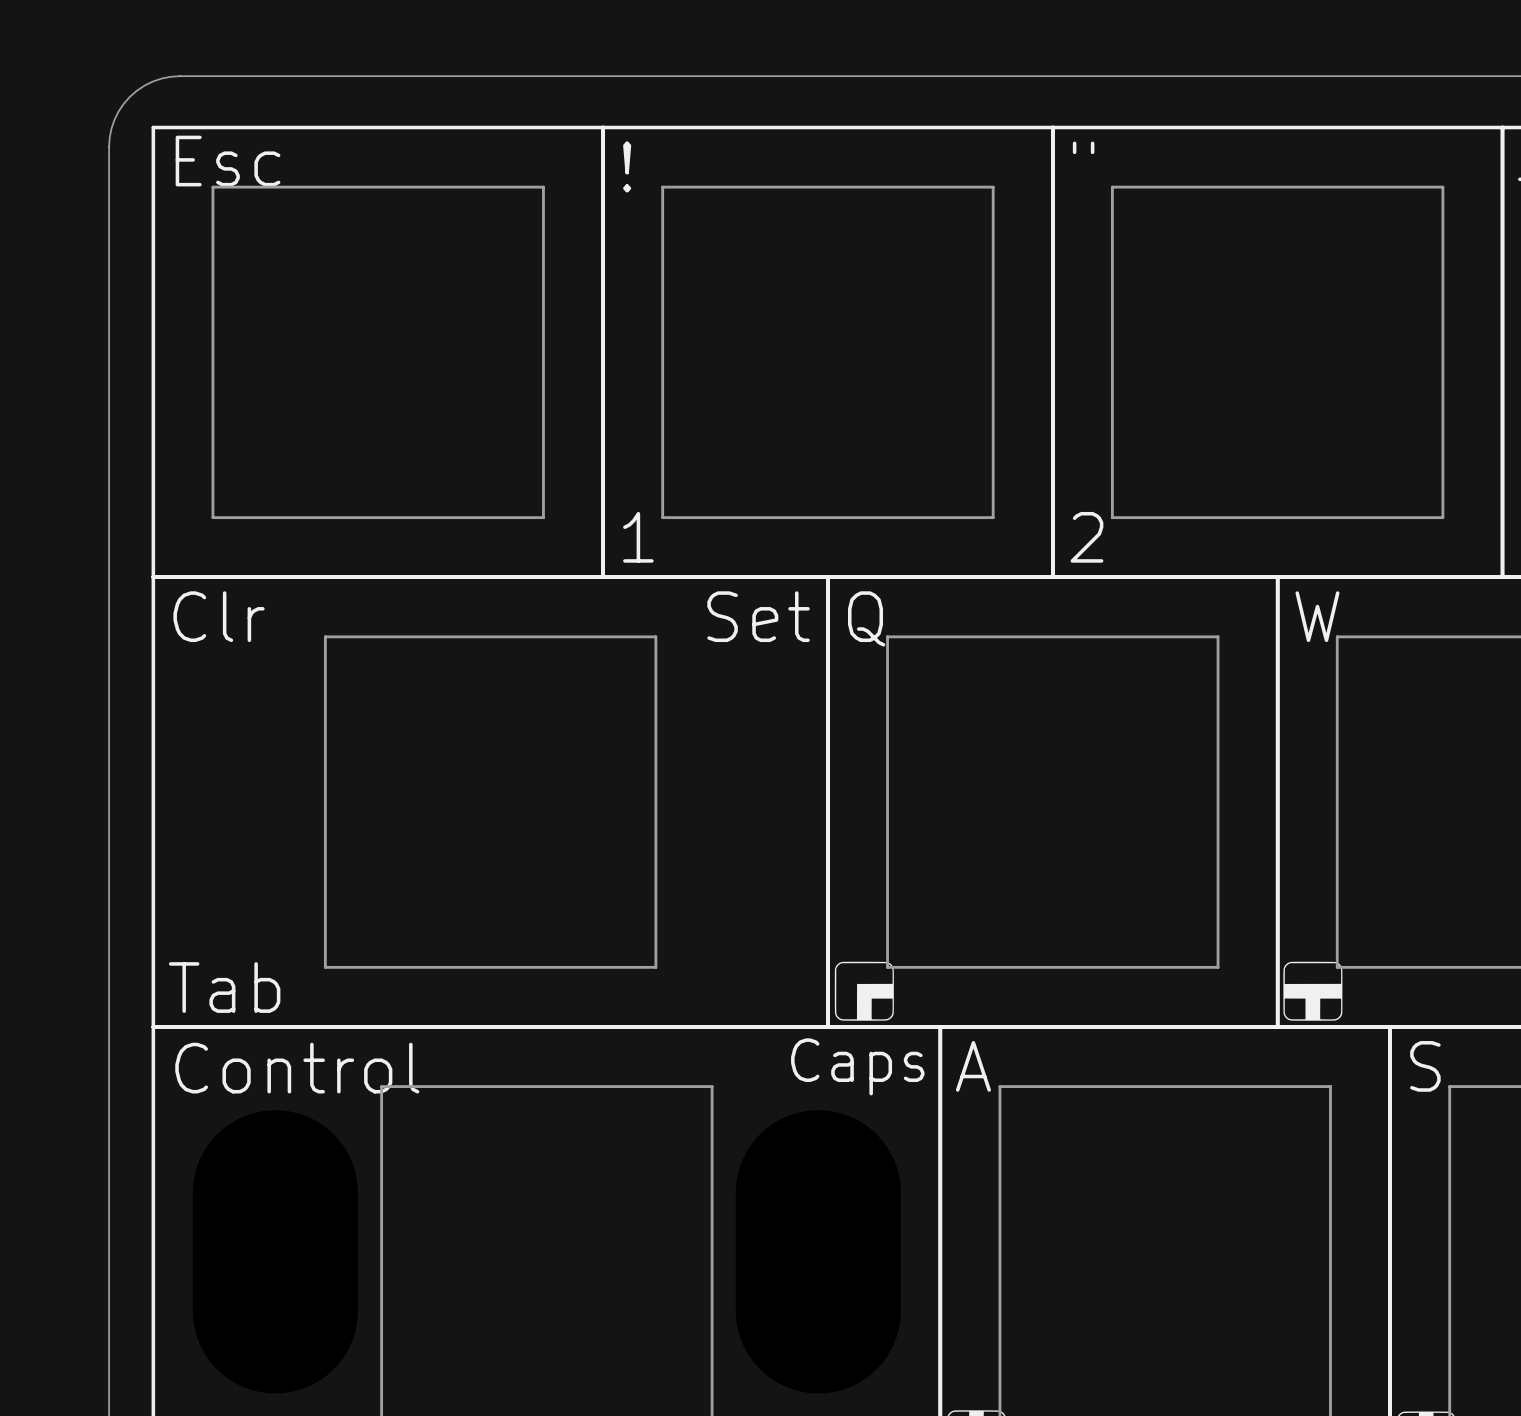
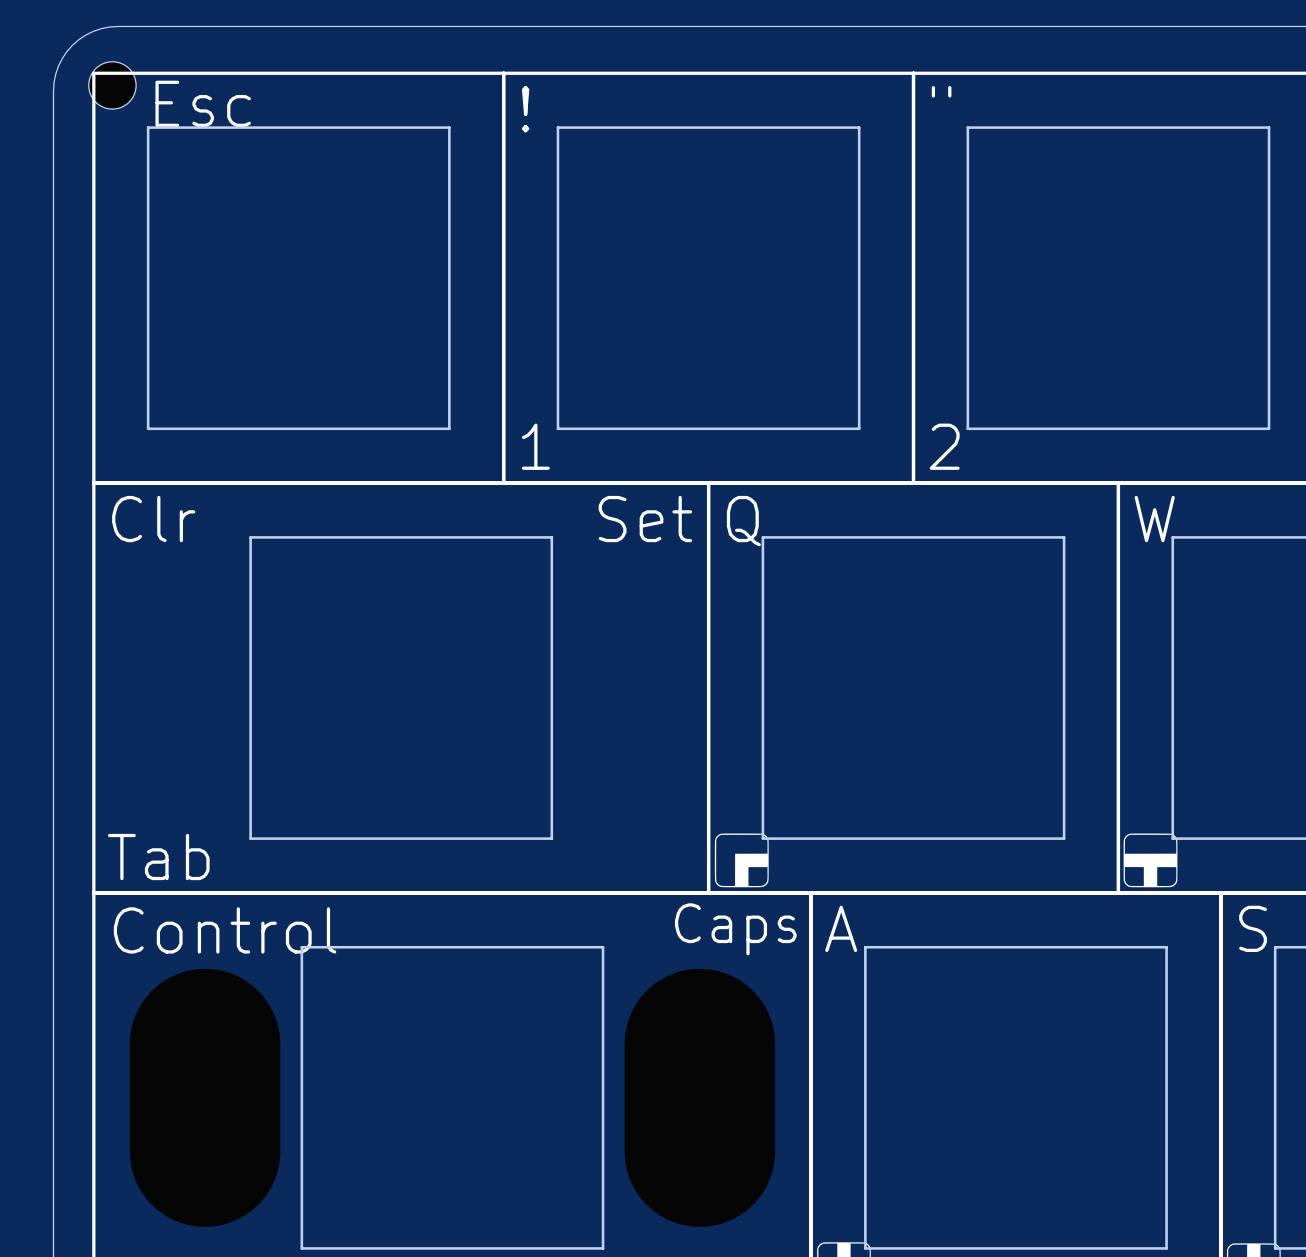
part: none -> (112, 85)
text position: Esc (228, 161) -> Esc (203, 103)

